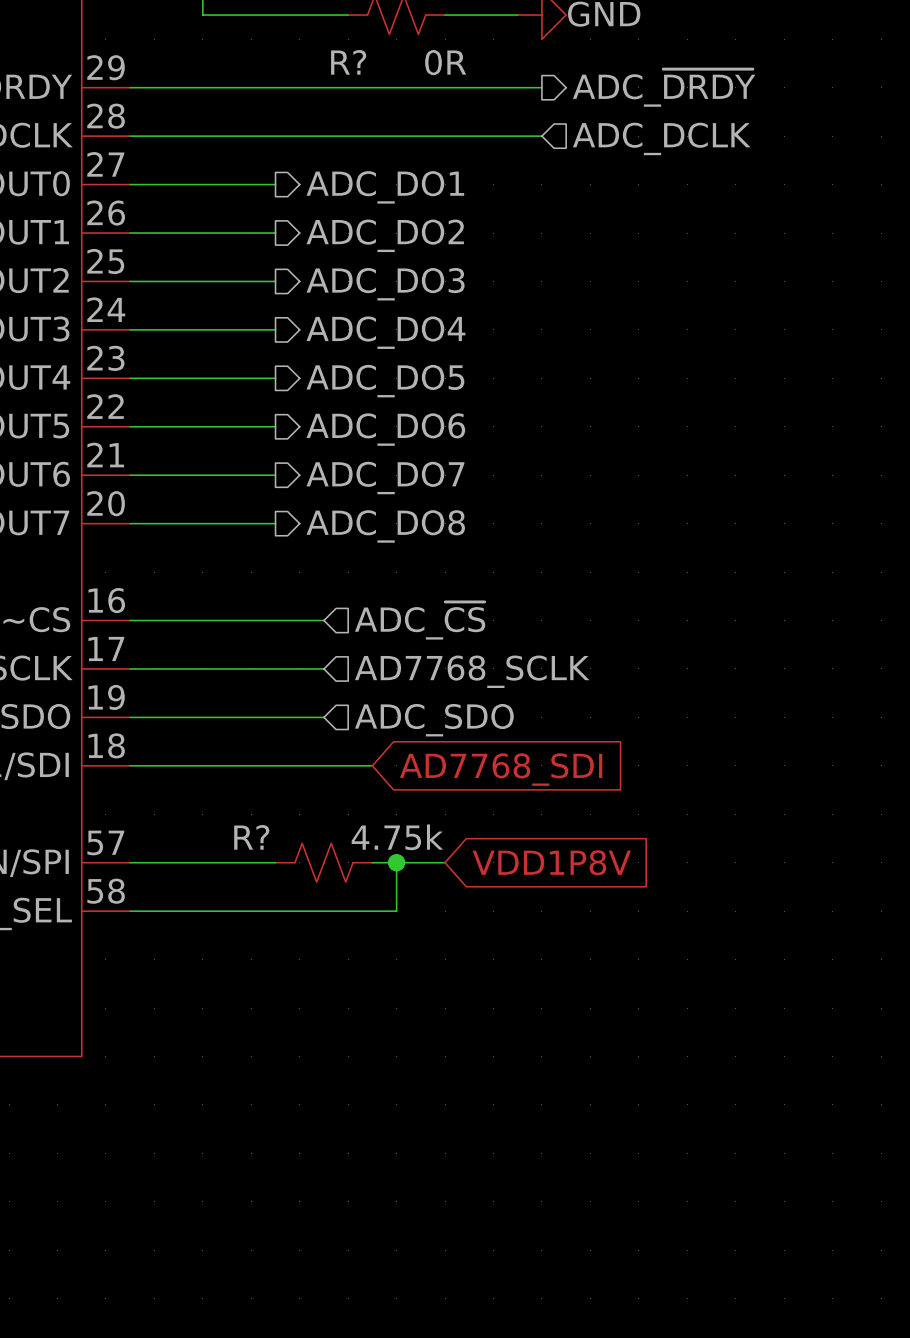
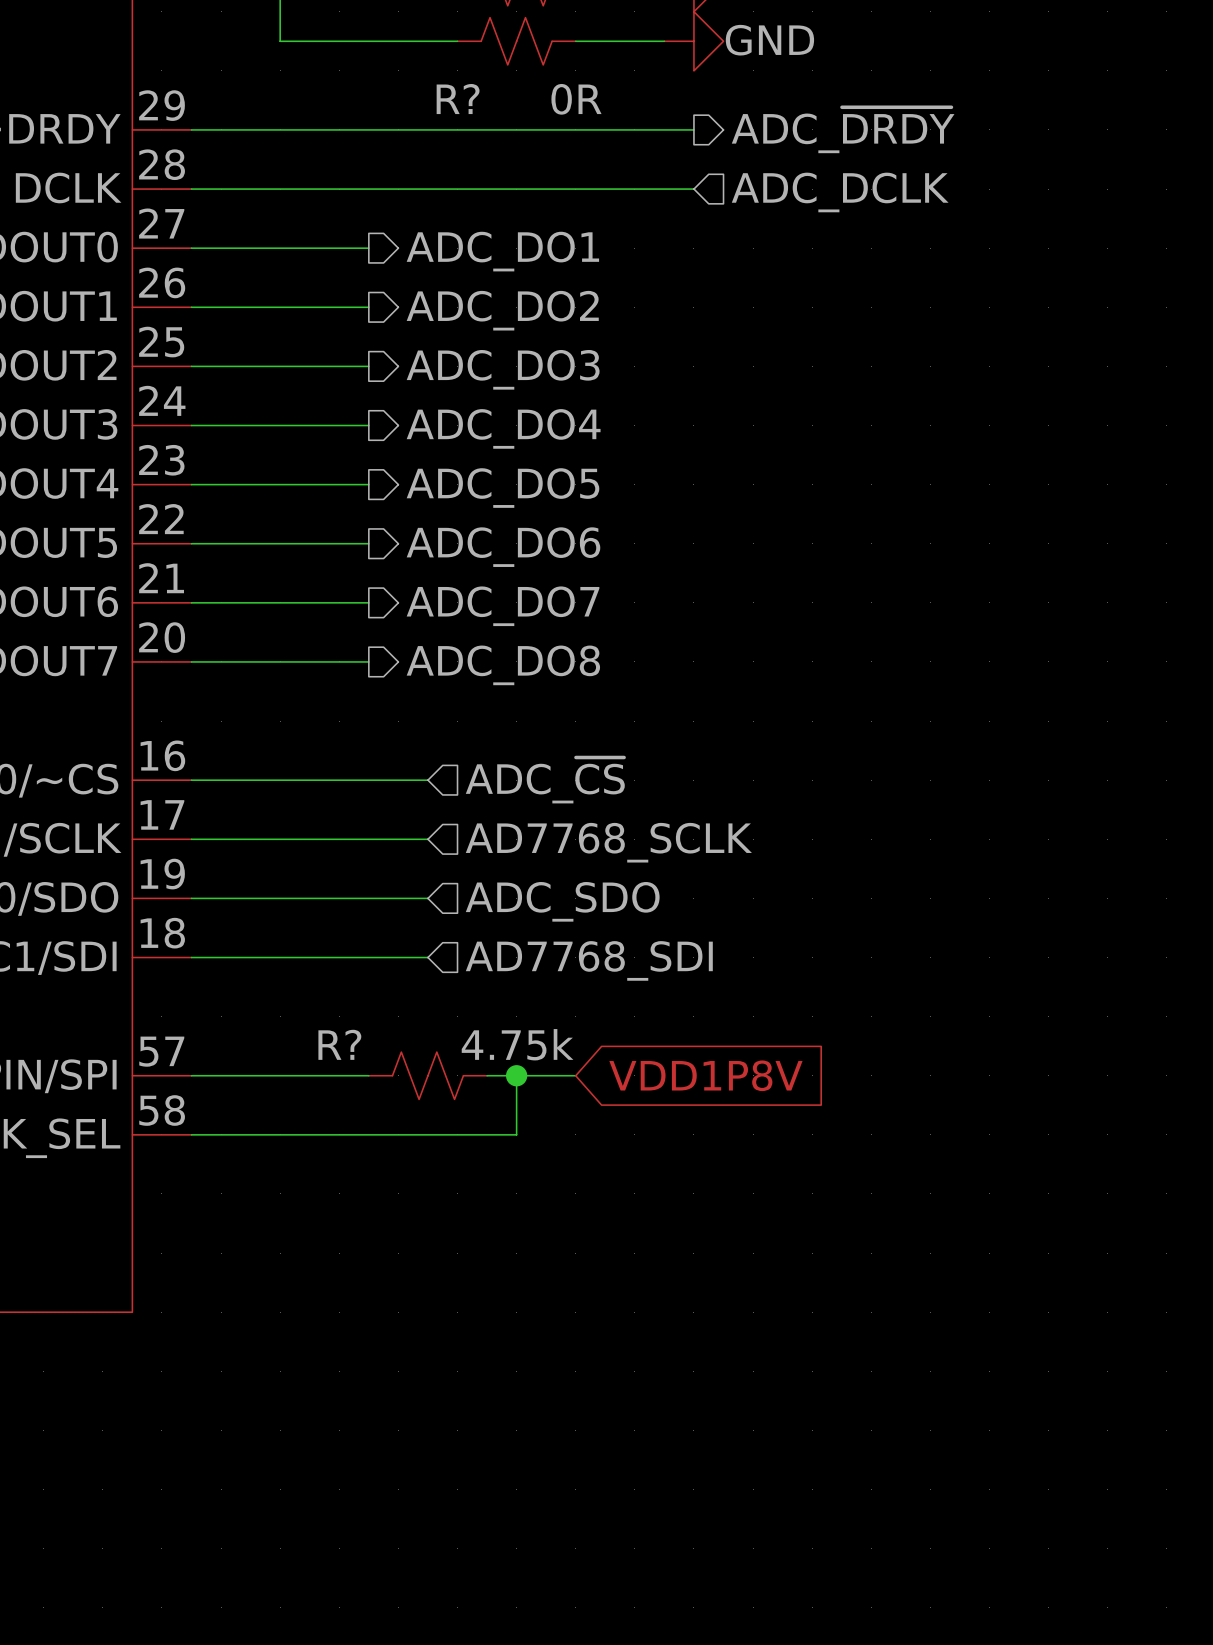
wire: (323, 765) (372, 765) -> none
hierarchical label: none -> AD7768_SDI (589, 960)
global label: AD7768_SDI (501, 769) -> none

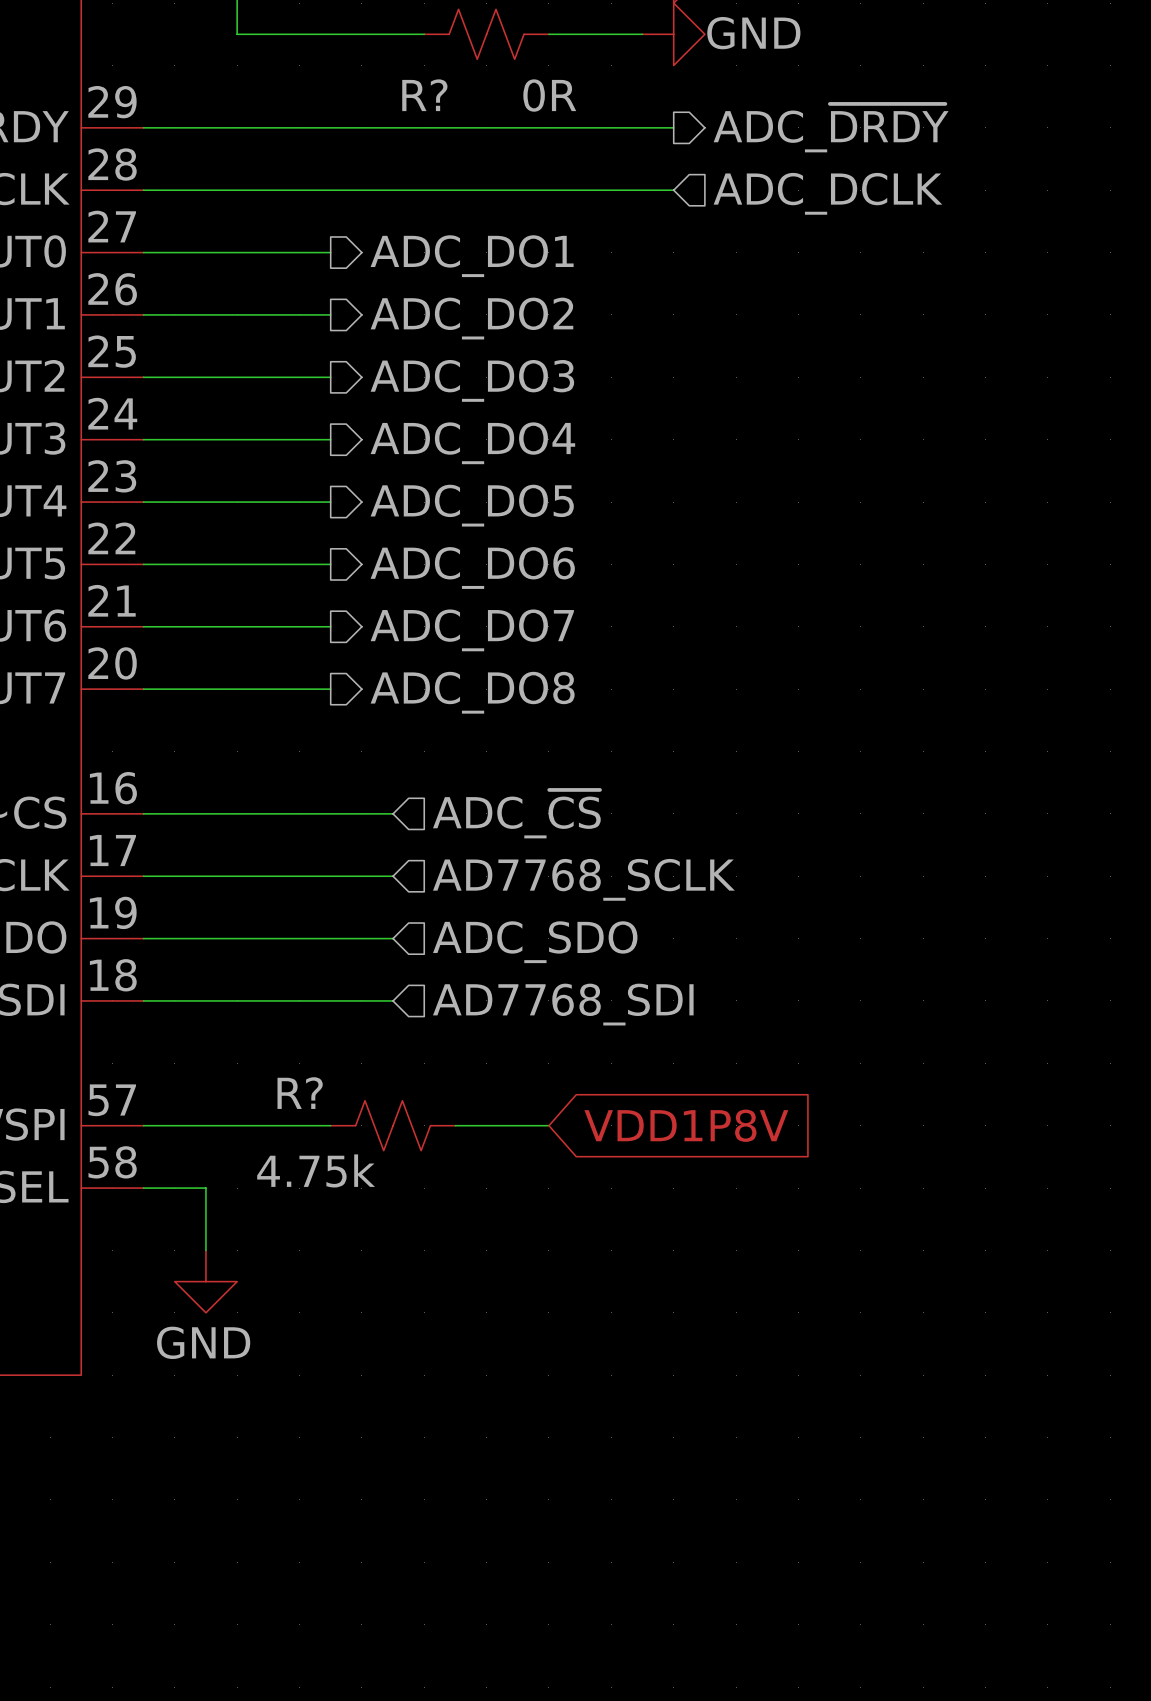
R? value position: 4.75k (517, 1044) -> 4.75k (316, 1170)
wire: (516, 1075) (516, 1134) (250, 1134) -> (205, 1250) (205, 1188)
junction: (516, 1075) -> none
power symbol: none -> GND (205, 1281)

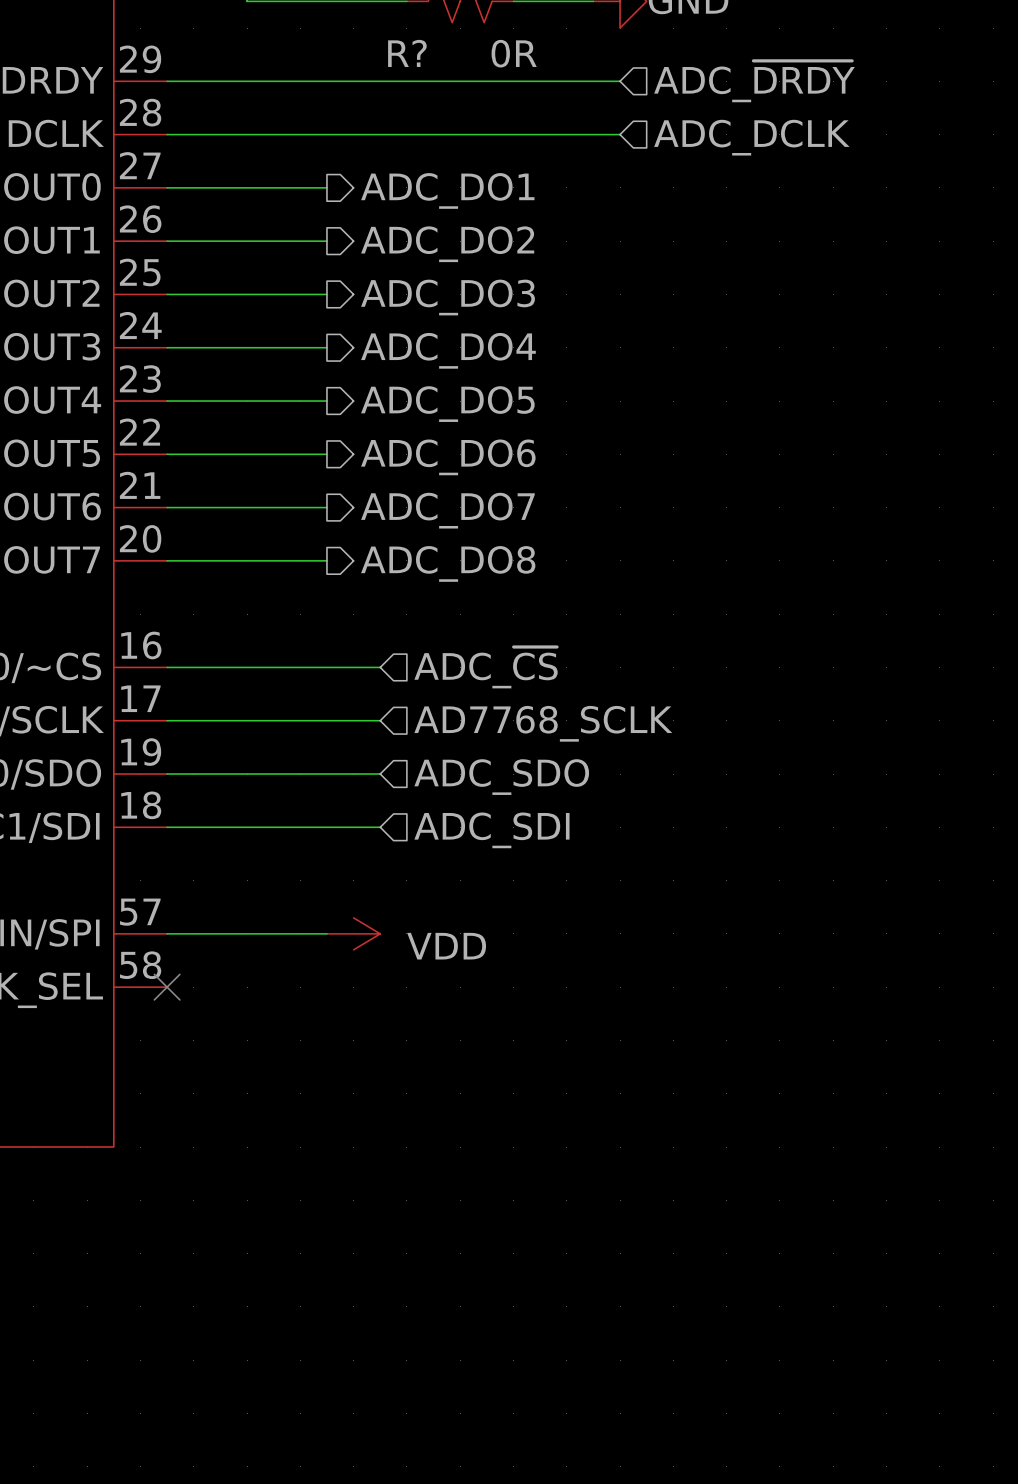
hierarchical label shape: output (831, 128) -> input (754, 81)
hierarchical label: AD7768_SDI (563, 1004) -> ADC_SDI (491, 830)
power symbol: none -> VDD (353, 933)
R?: 4.75k (393, 1125) -> none
wire: (455, 1125) (548, 1125) -> none
global label: VDD1P8V (686, 1125) -> none
wire: (143, 1188) (205, 1188) (205, 1250) -> none
no-connect mark: none -> (167, 987)
power symbol: GND (205, 1281) -> none

